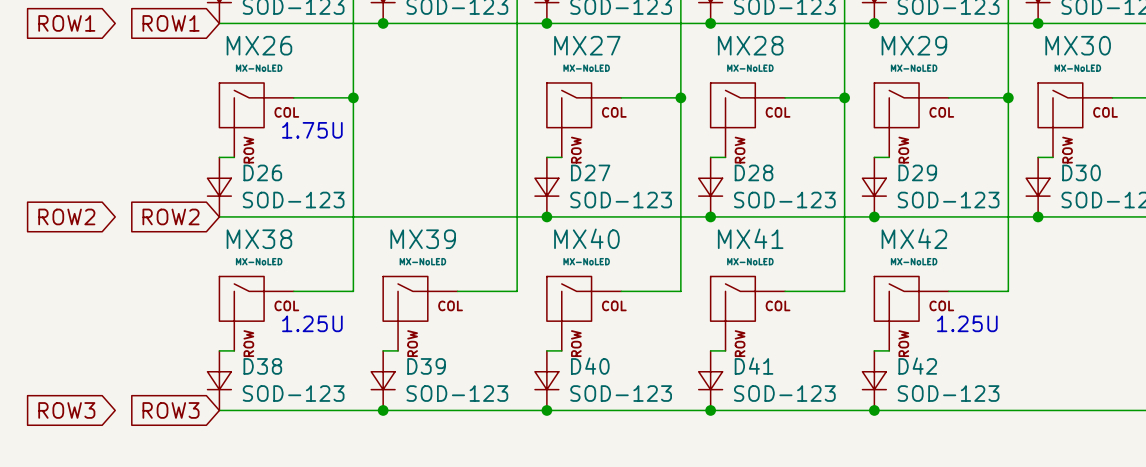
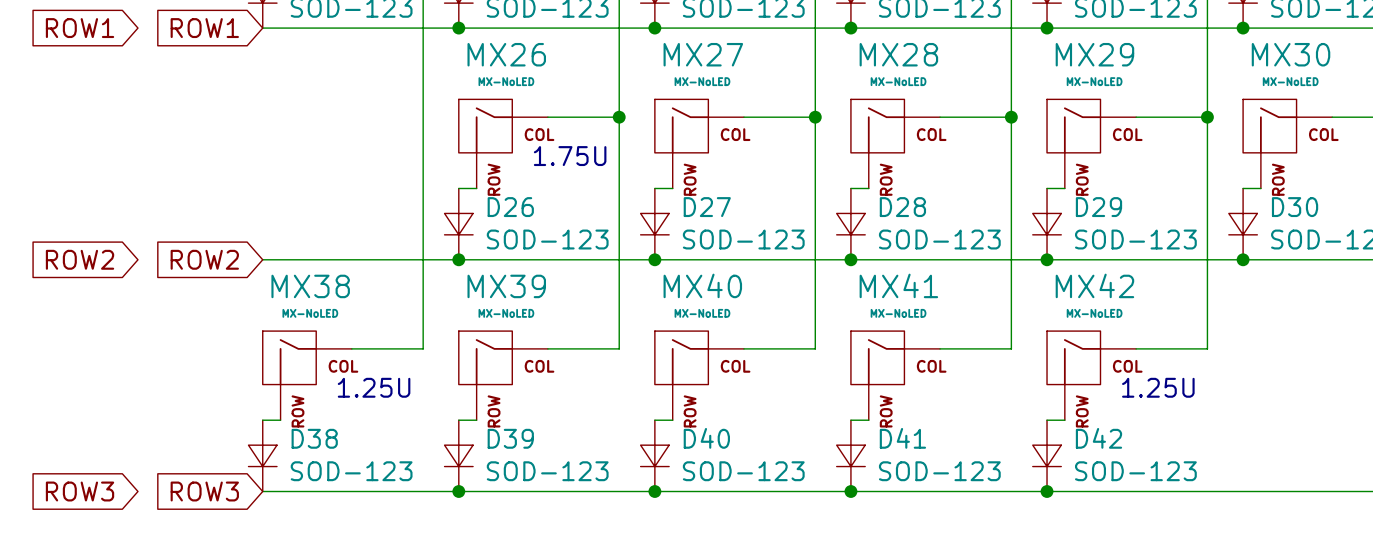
wire: (293, 97) (353, 97) -> (547, 117) (619, 117)
junction: (353, 97) -> none
junction: none -> (619, 117)
MX26 position: (256, 120) -> (503, 143)
text position: 1.75U (312, 130) -> 1.75U (570, 156)
wire: (219, 157) (234, 157) -> (458, 188) (476, 188)
D26 position: (219, 187) -> (458, 224)
junction: none -> (458, 259)

